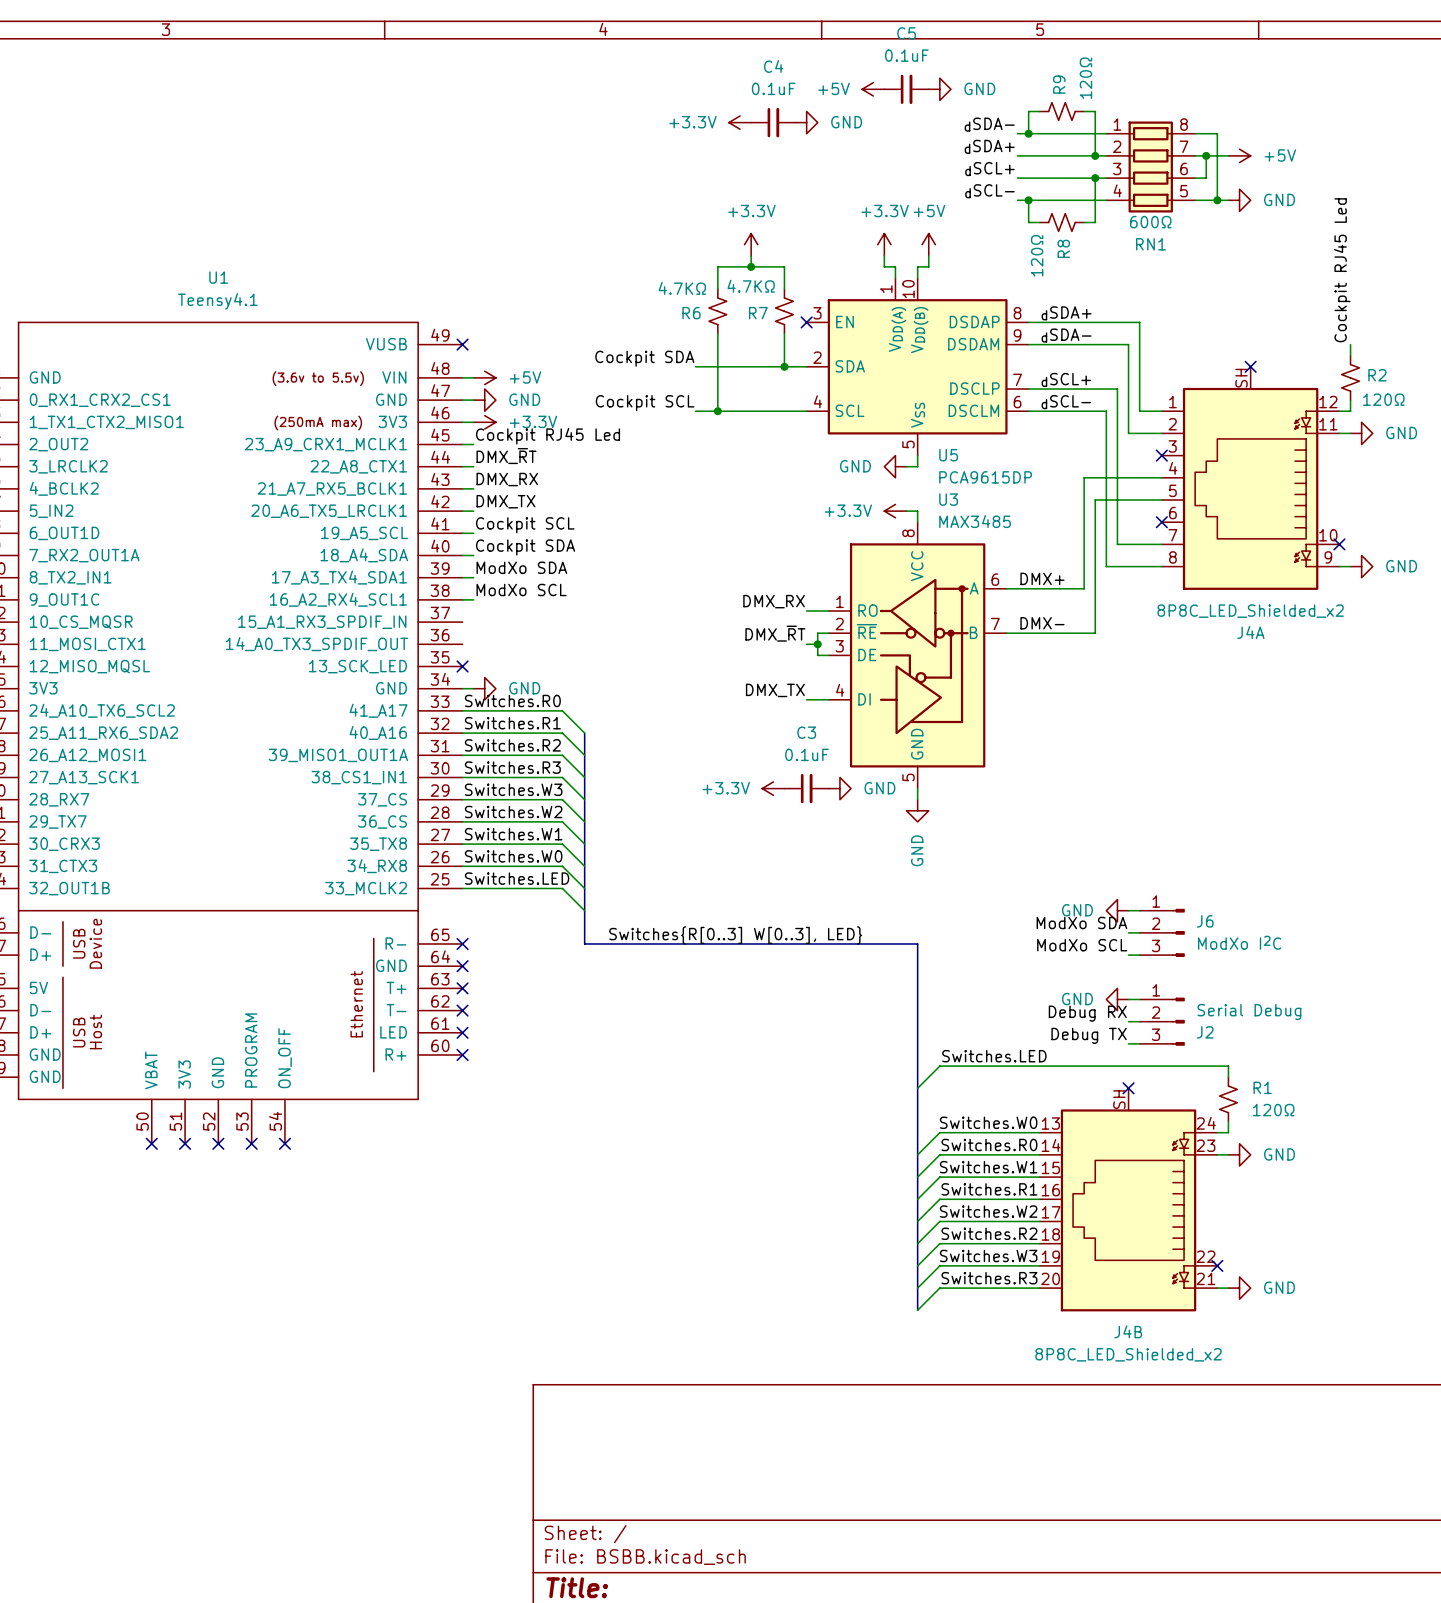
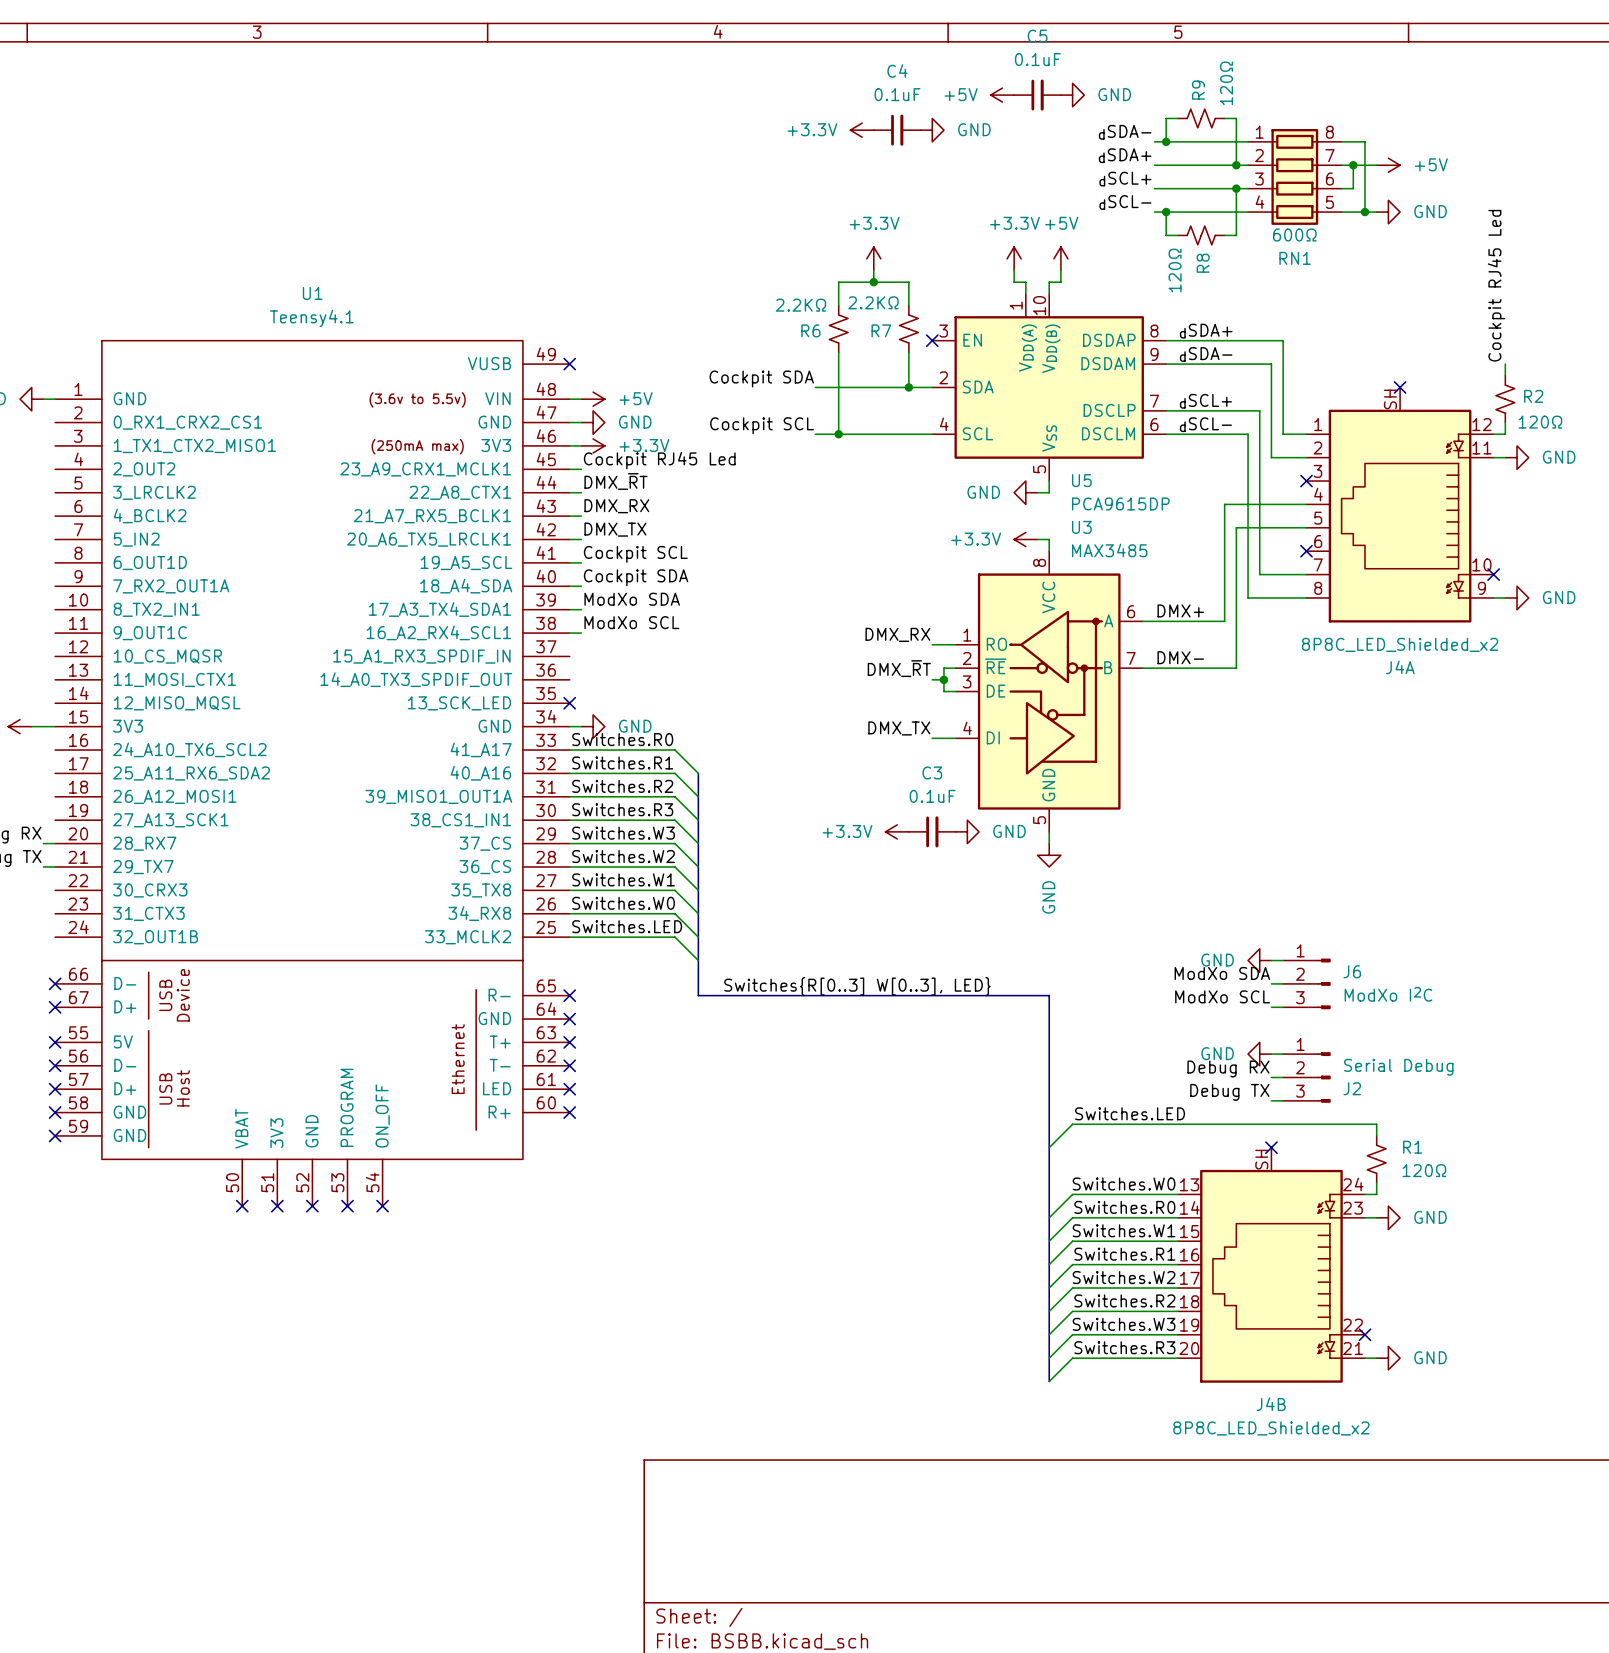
R7 value: 4.7KΩ (751, 286) -> 2.2KΩ (873, 302)
R6 value: 4.7KΩ (682, 288) -> 2.2KΩ (801, 305)

